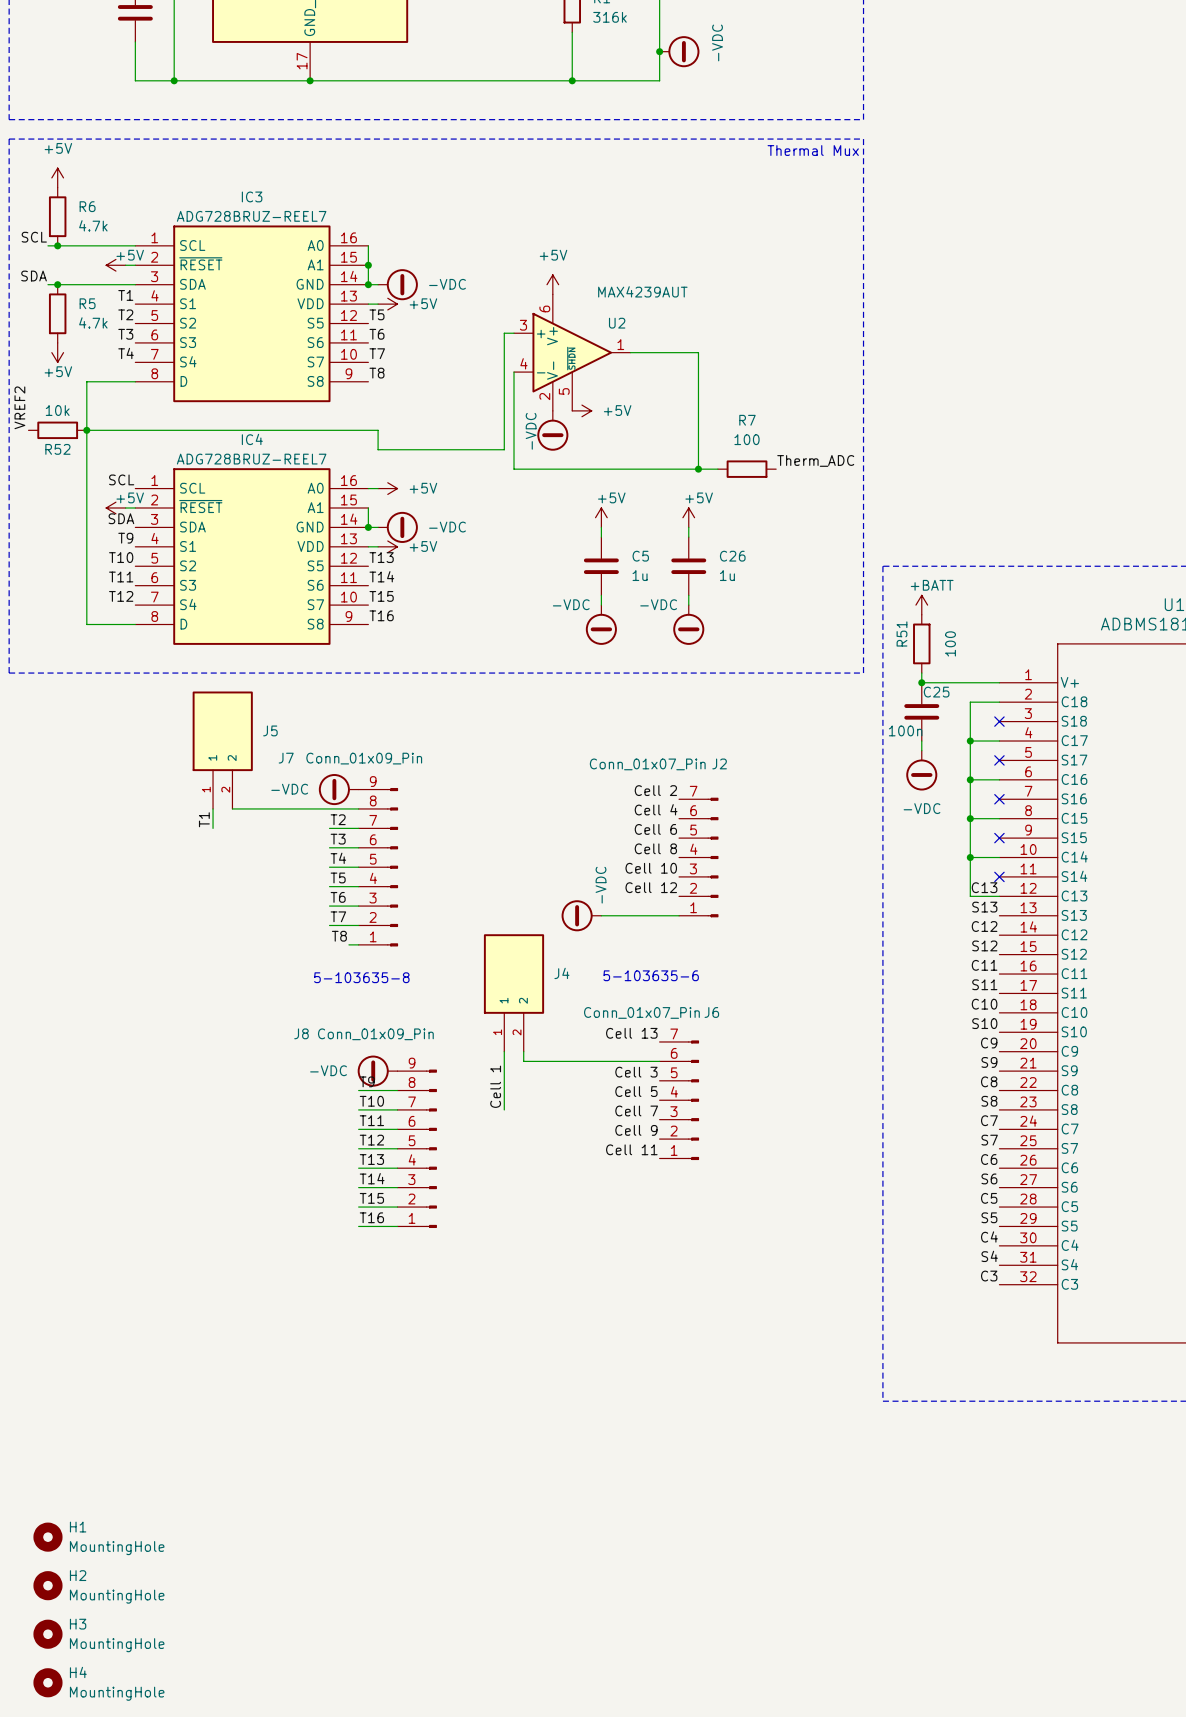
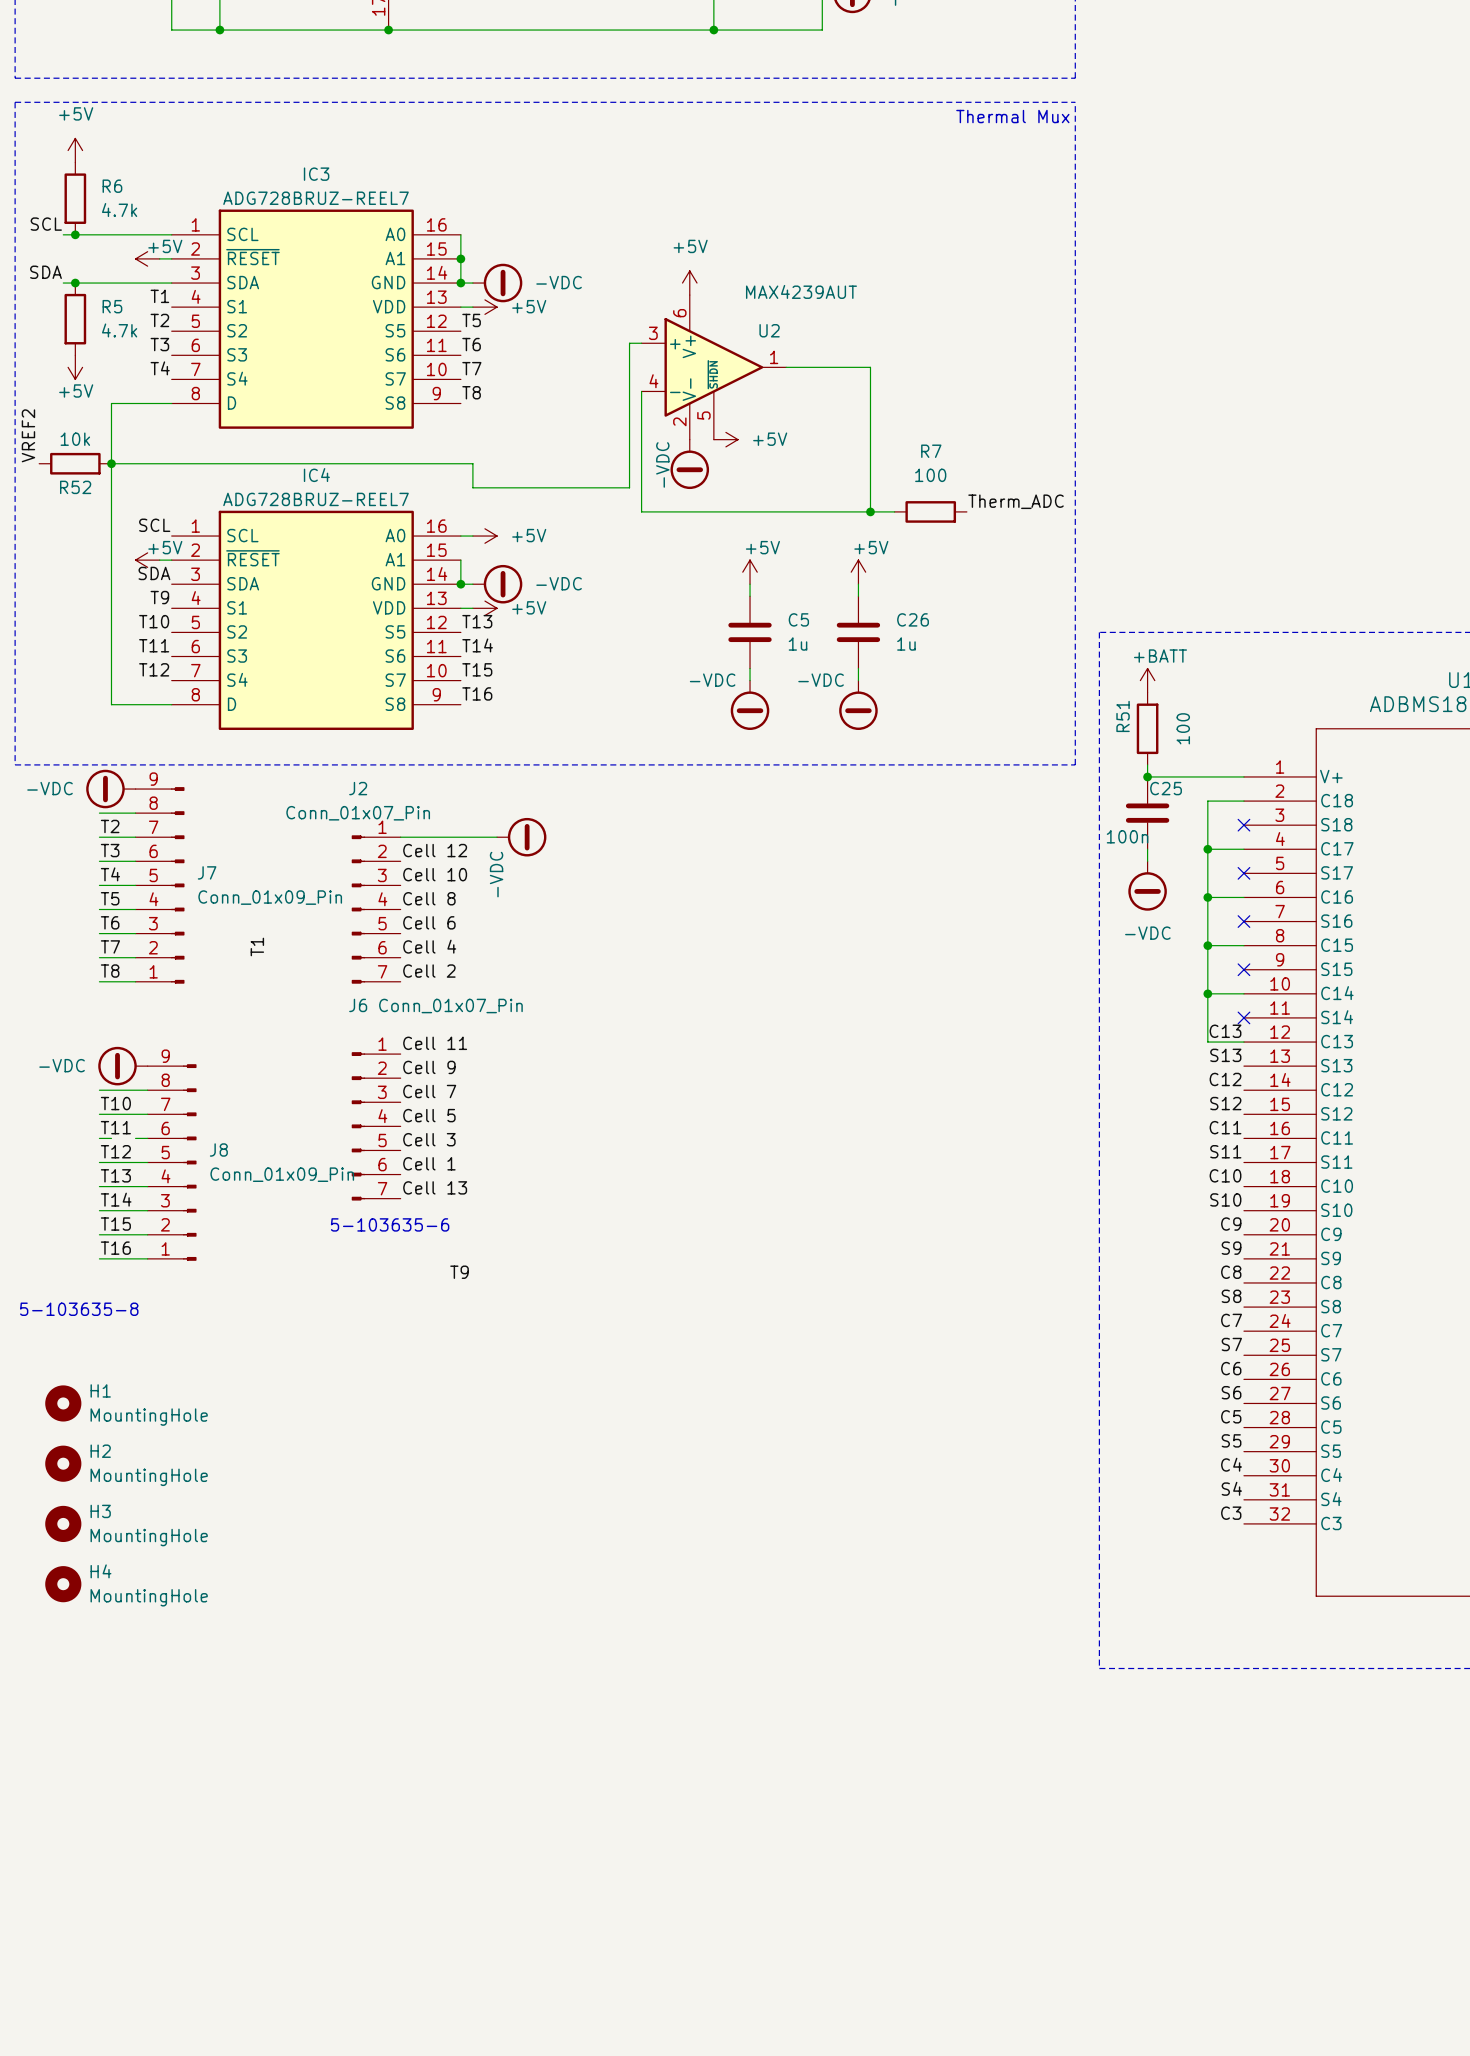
power symbol: none -> -VDC (110, 789)
wire: none -> (99, 813) (135, 813)
label: none -> T2 (110, 826)
wire: none -> (99, 837) (135, 837)
wire: none -> (400, 837) (497, 837)
label: none -> T3 (110, 850)
label: none -> Cell 12 (435, 850)
wire: none -> (99, 861) (135, 861)
J5: (222, 750) -> none
J7 name position: J7 (286, 758) -> J7 (207, 872)
J7 value position: Conn_01x09_Pin (364, 758) -> Conn_01x09_Pin (270, 897)
label: none -> T4 (110, 874)
label: none -> Cell 10 (435, 874)
J2 name position: J2 (719, 763) -> J2 (358, 788)
J2 value position: Conn_01x07_Pin (647, 764) -> Conn_01x07_Pin (358, 813)
wire: none -> (99, 885) (135, 885)
label: none -> T5 (110, 898)
label: none -> Cell 8 (429, 898)
wire: none -> (99, 909) (135, 909)
power symbol text position: -VDC (289, 789) -> -VDC (496, 874)
power symbol rotation: 0° (338, 789) -> 180° (521, 837)
power symbol position: -VDC (338, 789) -> -VDC (521, 837)
label: Cell 2 (655, 790) -> none
label: none -> T6 (110, 922)
label: none -> Cell 6 (429, 922)
wire: none -> (99, 933) (135, 933)
wire: (213, 808) (213, 828) -> none
wire: (232, 808) (358, 808) -> none
label: Cell 4 (656, 809) -> none
label: none -> T7 (110, 946)
label: T2 (338, 819) -> none
label: none -> Cell 4 (429, 946)
wire: none -> (99, 957) (135, 957)
wire: (329, 828) (358, 828) -> none
label: Cell 6 (655, 829) -> none
label: none -> T8 (110, 971)
label: T3 (338, 839) -> none
label: none -> Cell 2 (429, 971)
wire: none -> (99, 981) (135, 981)
wire: (329, 847) (358, 847) -> none
label: Cell 8 (655, 848) -> none
J2 position: (698, 857) -> (376, 909)
J2 rotation: 0° (713, 857) -> 180° (358, 909)
label: T4 (338, 858) -> none
wire: (329, 867) (358, 867) -> none
J7 position: (378, 867) -> (160, 885)
label: Cell 10 (651, 868) -> none
label: T5 (338, 877) -> none
wire: (329, 886) (358, 886) -> none
label: Cell 12 (651, 887) -> none
label: T6 (338, 897) -> none
label: none -> Cell 11 (435, 1043)
wire: (329, 906) (358, 906) -> none
power symbol: none -> -VDC (122, 1066)
power symbol: -VDC (581, 915) -> none
wire: (601, 915) (679, 915) -> none
label: T7 (338, 916) -> none
label: none -> Cell 9 (429, 1067)
wire: (329, 925) (358, 925) -> none
wire: none -> (99, 1090) (147, 1090)
label: T8 (339, 936) -> none
label: none -> Cell 7 (429, 1091)
wire: (348, 944) (358, 944) -> none
label: none -> T10 (115, 1103)
wire: none -> (99, 1114) (147, 1114)
label: none -> Cell 5 (429, 1115)
label: none -> T11 (115, 1127)
wire: none -> (99, 1138) (111, 1138)
wire: none -> (135, 1138) (147, 1138)
label: none -> Cell 3 (429, 1139)
text: 5-103635-6 (651, 975) -> none
text: 5-103635-8 (361, 977) -> none
label: none -> T12 (115, 1151)
J4: (514, 992) -> none
wire: none -> (99, 1162) (147, 1162)
label: none -> Cell 1 (429, 1163)
label: none -> T13 (115, 1175)
wire: none -> (99, 1186) (147, 1186)
J6 value position: Conn_01x07_Pin (641, 1012) -> Conn_01x07_Pin (450, 1006)
J6 name position: J6 (711, 1012) -> J6 (358, 1005)
label: none -> Cell 13 (435, 1187)
label: none -> T14 (116, 1199)
wire: none -> (99, 1210) (147, 1210)
J8 name position: J8 (301, 1033) -> J8 (218, 1150)
label: Cell 13 (631, 1033) -> none
J8 value position: Conn_01x09_Pin (375, 1034) -> Conn_01x09_Pin (282, 1174)
label: none -> T15 (115, 1224)
text: none -> 5-103635-6 (390, 1224)
wire: none -> (99, 1234) (147, 1234)
wire: (504, 1051) (504, 1109) -> none
wire: (523, 1051) (523, 1061) (659, 1061) -> none
label: none -> T16 (115, 1248)
wire: none -> (99, 1258) (147, 1258)
power symbol: -VDC (377, 1071) -> none
label: Cell 3 (636, 1072) -> none
label: Cell 1 (495, 1086) -> none
wire: (358, 1090) (397, 1090) -> none
label: Cell 5 (636, 1091) -> none
J6 position: (679, 1100) -> (376, 1126)
J6 rotation: 0° (693, 1100) -> 180° (358, 1126)
label: T10 (371, 1101) -> none
wire: (358, 1109) (397, 1109) -> none
label: Cell 7 (636, 1110) -> none
text: none -> 5-103635-8 (79, 1309)
label: T11 (371, 1120) -> none
wire: (358, 1129) (397, 1129) -> none
label: Cell 9 (636, 1130) -> none
label: T12 (371, 1140) -> none
wire: (358, 1148) (397, 1148) -> none
J8 position: (417, 1148) -> (172, 1162)
label: Cell 11 (631, 1149) -> none
label: T13 (371, 1159) -> none
wire: (358, 1168) (397, 1168) -> none
label: T14 (372, 1178) -> none
wire: (358, 1187) (397, 1187) -> none
label: T15 (371, 1198) -> none
wire: (358, 1207) (397, 1207) -> none
label: T16 (371, 1217) -> none
wire: (358, 1226) (397, 1226) -> none
H1 position: (47, 1537) -> (63, 1403)
H2 position: (47, 1585) -> (63, 1463)
H3 position: (47, 1634) -> (63, 1523)
H4 position: (47, 1682) -> (63, 1584)

